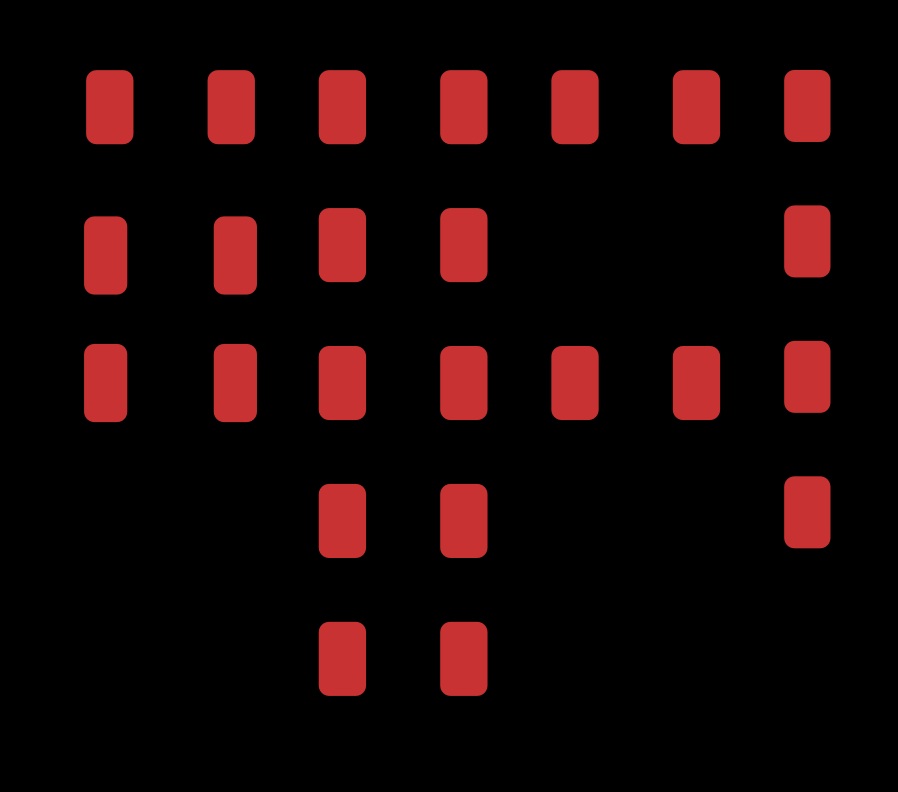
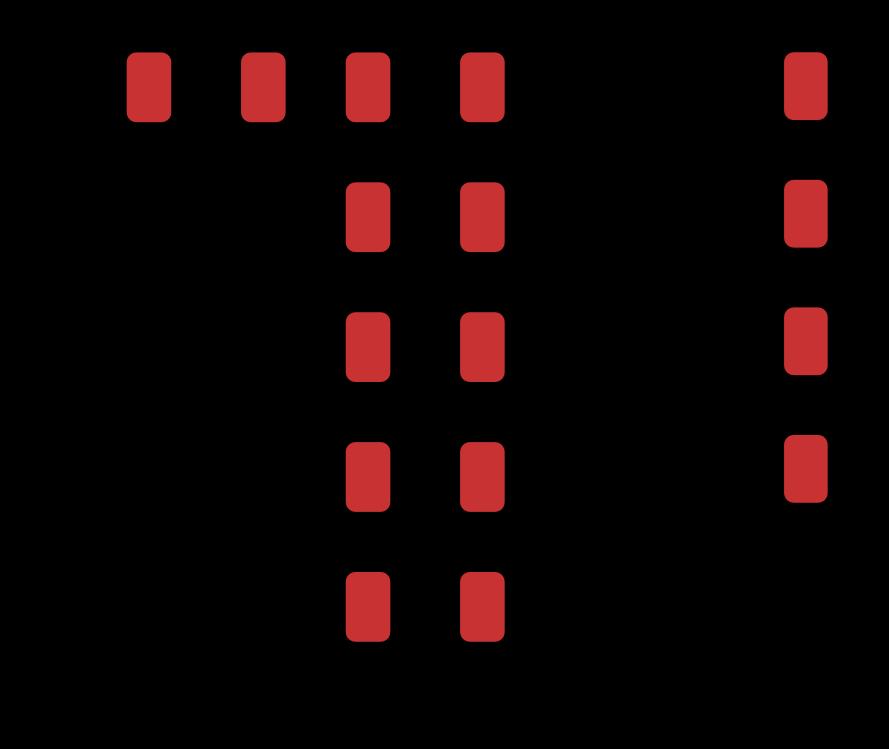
part: (635, 107) -> none
part: (170, 255) -> none
part: (170, 383) -> none
part: (635, 383) -> none

